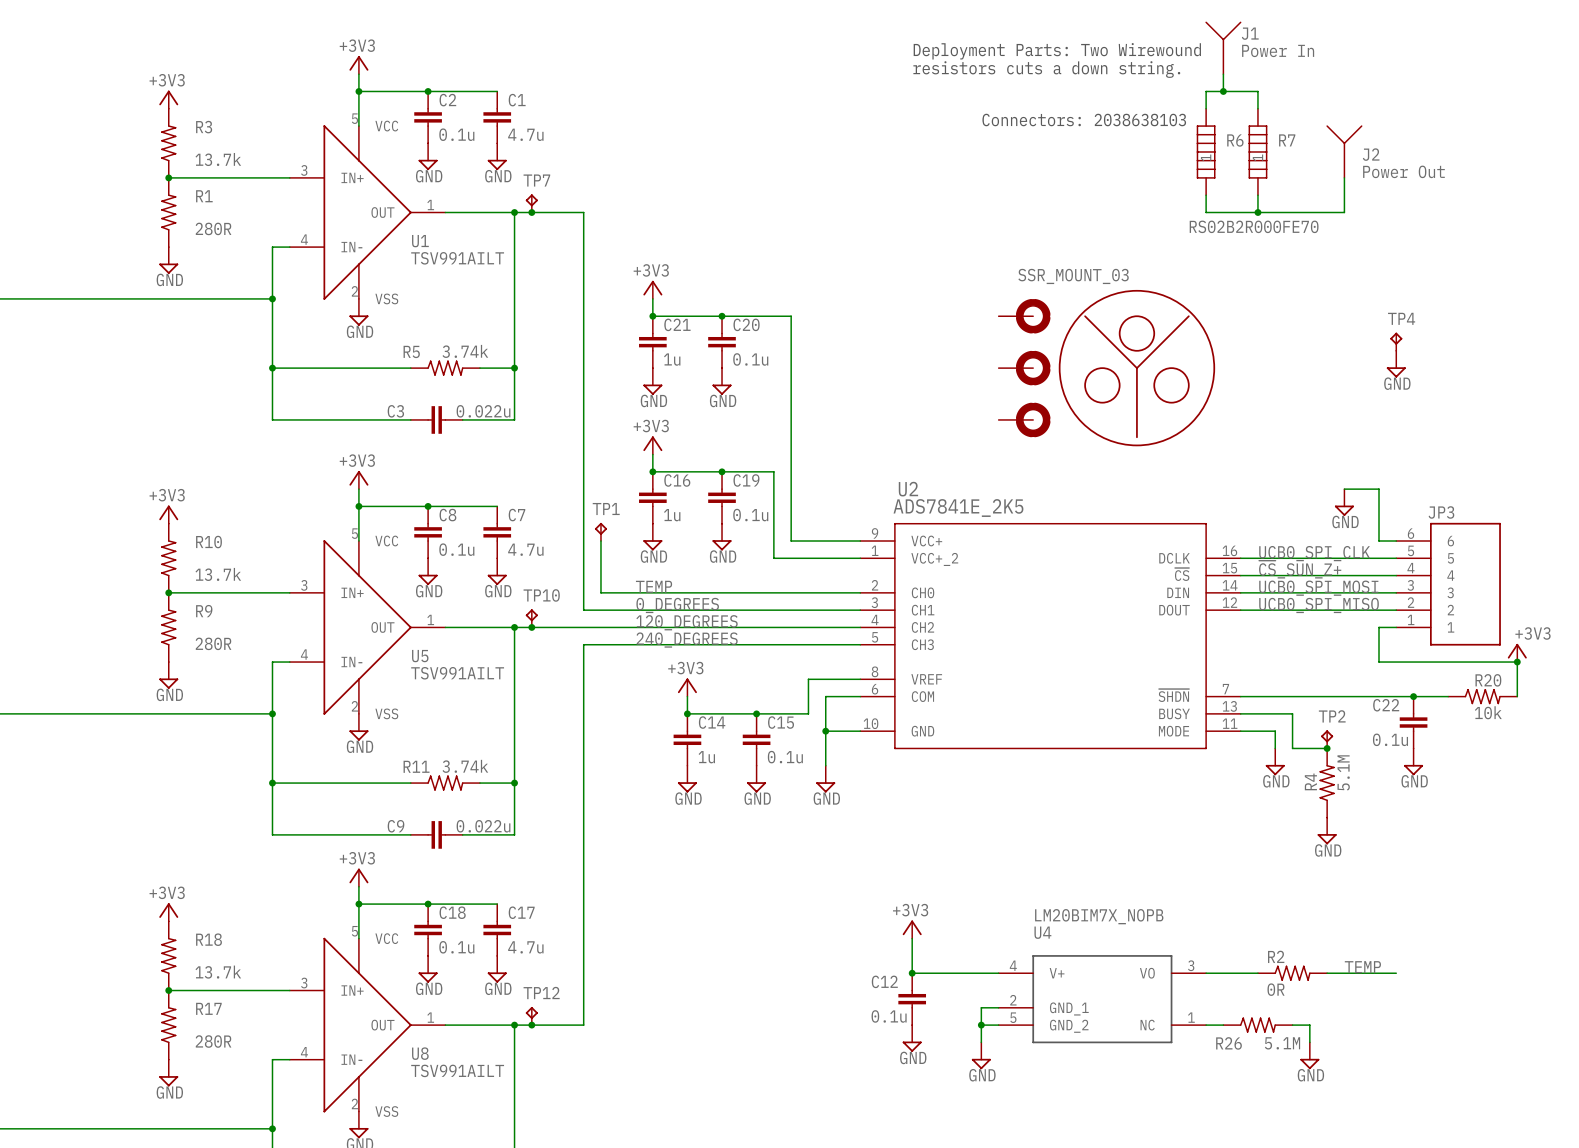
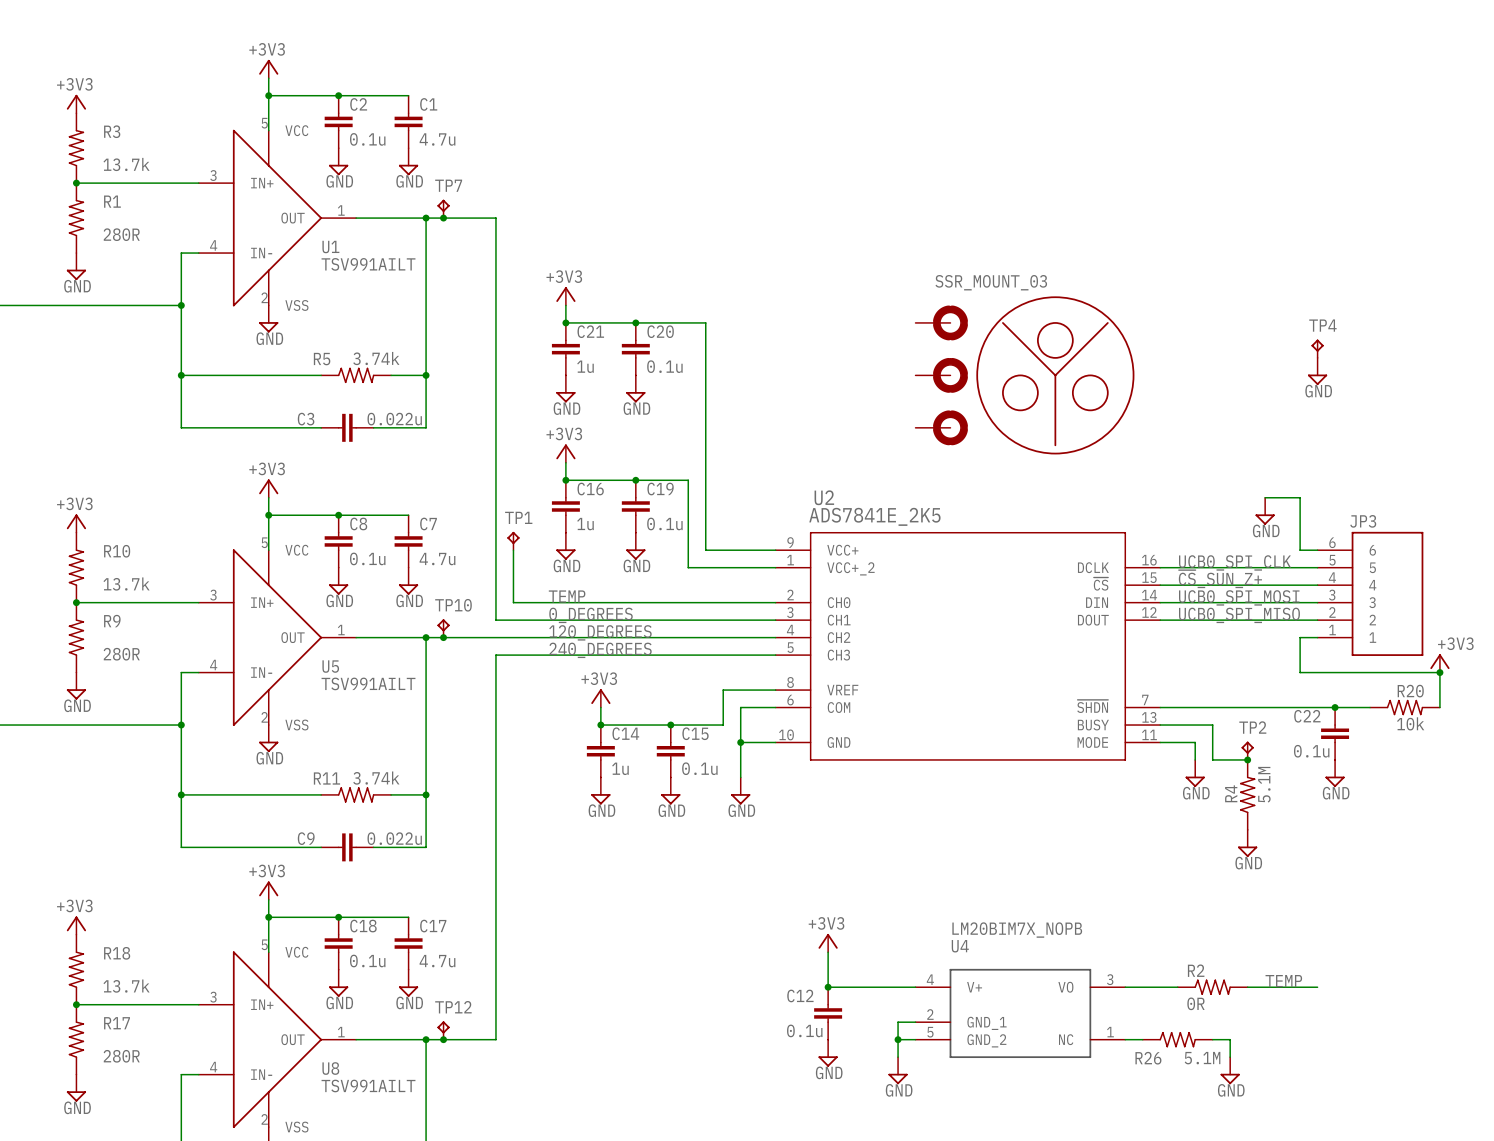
J1: Power In (1223, 47) -> none
text: Deployment Parts: Two Wirewound (1057, 51) -> none
text: resistors cuts a down string. (1046, 69) -> none
wire: (1223, 74) (1223, 91) -> none
junction: (1223, 91) -> none
wire: (1206, 108) (1206, 91) (1257, 91) (1257, 108) -> none
text: Connectors: 2038638103 (1084, 120) -> none
R6: RS02B2R000FE70 (1206, 151) -> none
R7: (1257, 151) -> none
J2: Power Out (1344, 151) -> none
wire: (1344, 177) (1344, 212) (1206, 212) (1206, 195) -> none
wire: (1257, 195) (1257, 212) -> none
junction: (1257, 212) -> none

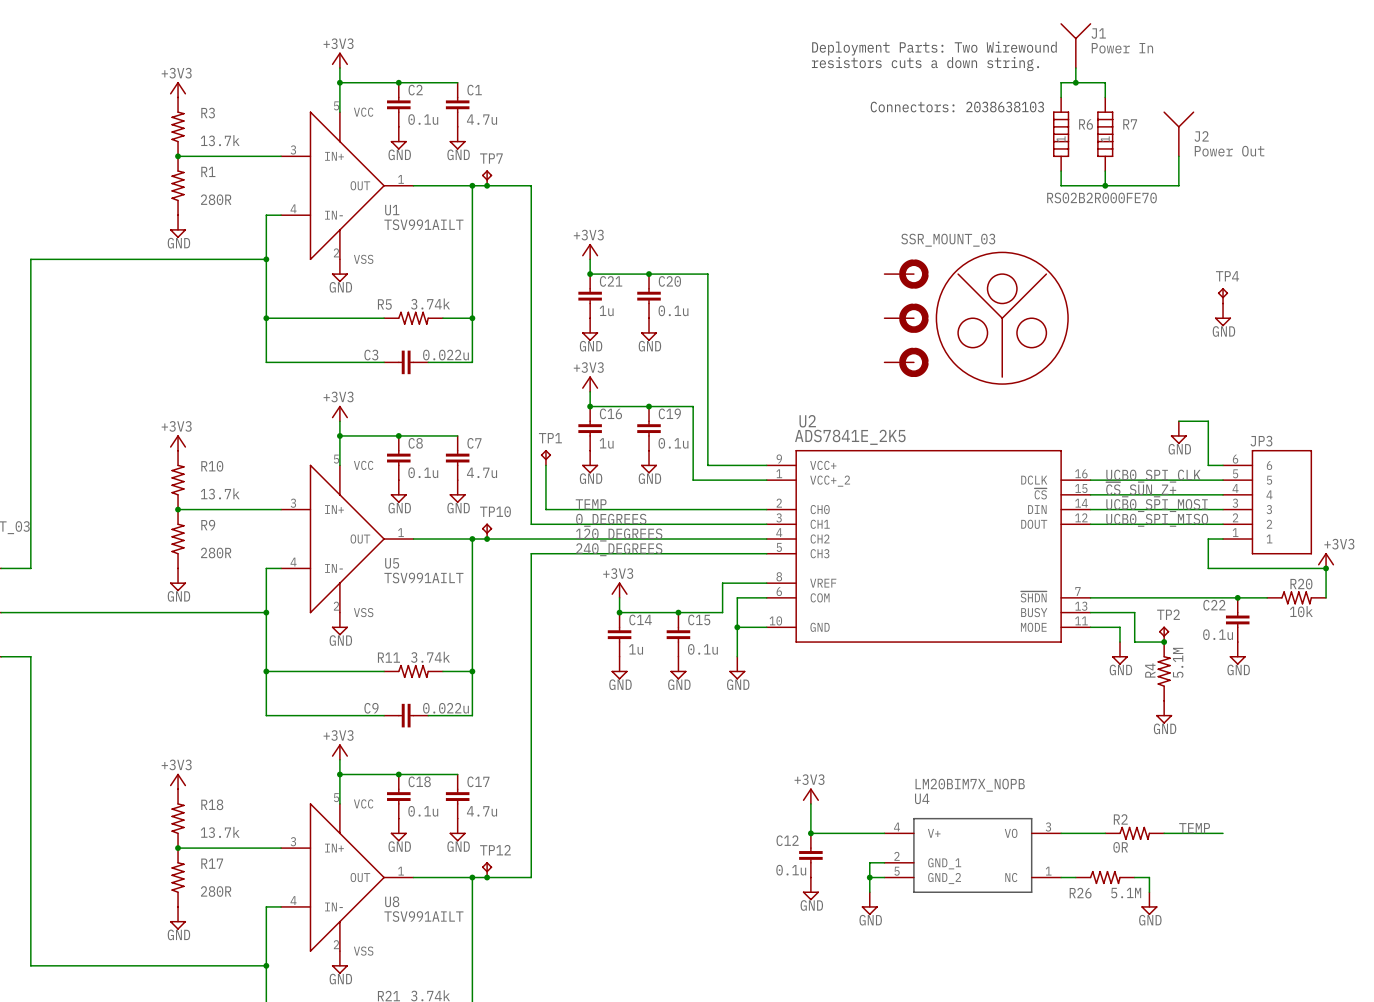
J1: none -> Power In (1075, 45)
text: none -> Deployment Parts: Two Wirewound (934, 48)
text: none -> resistors cuts a down string. (925, 64)
wire: none -> (1075, 68) (1075, 82)
junction: none -> (1075, 82)
wire: none -> (1061, 97) (1061, 82) (1105, 82) (1105, 97)
text: none -> Connectors: 2038638103 (957, 107)
R6: none -> RS02B2R000FE70 (1061, 134)
R7: none -> (1105, 134)
J2: none -> Power Out (1178, 134)
wire: none -> (1178, 156) (1178, 185) (1061, 185) (1061, 171)
wire: none -> (1105, 171) (1105, 185)
junction: none -> (1105, 185)

